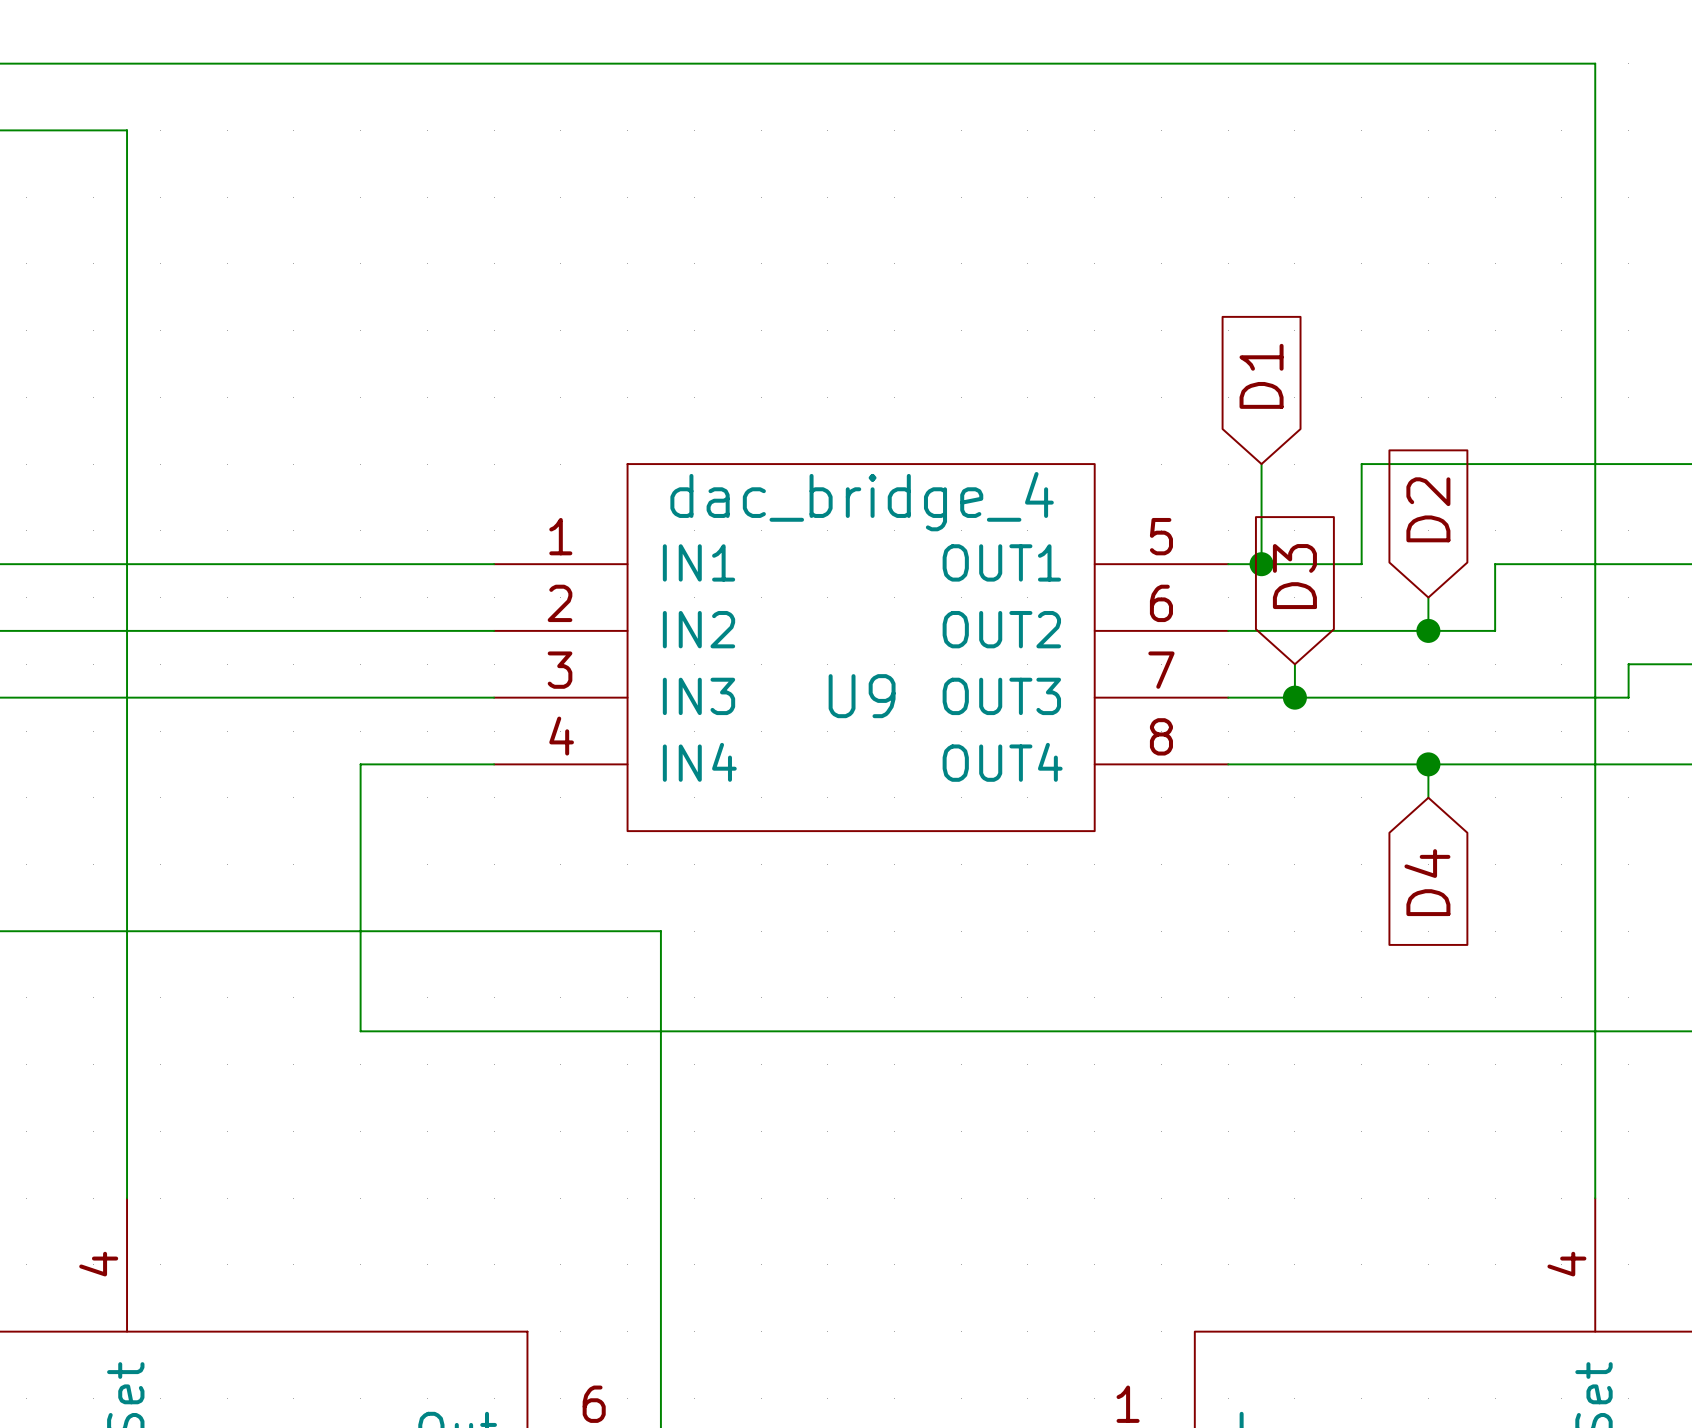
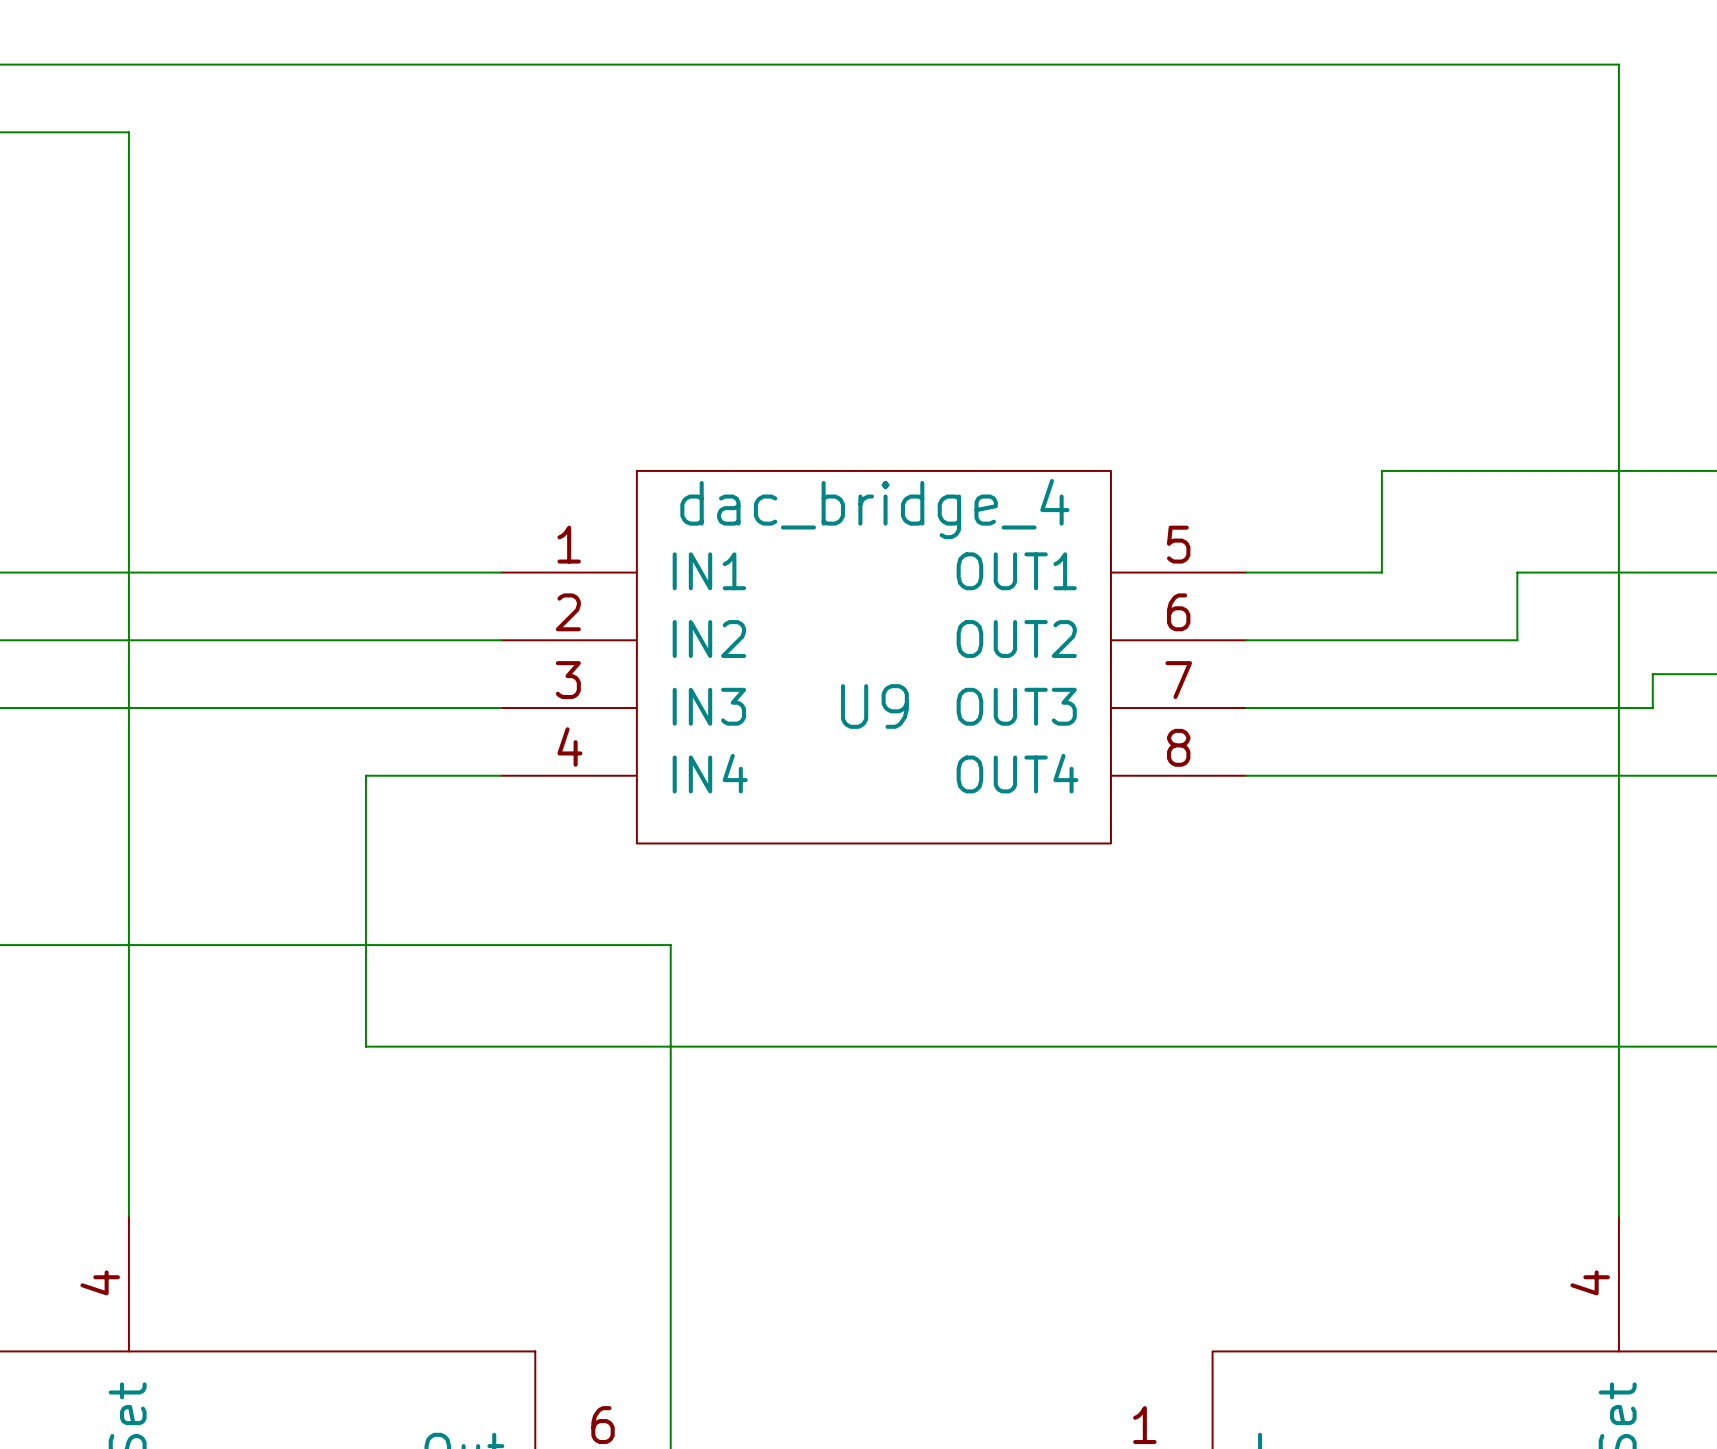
global label: D1 (1261, 376) -> none
wire: (1261, 464) (1261, 564) -> none
global label: D2 (1428, 509) -> none
junction: (1261, 564) -> none
global label: D3 (1294, 576) -> none
wire: (1428, 597) (1428, 630) -> none
junction: (1428, 630) -> none
wire: (1294, 664) (1294, 697) -> none
junction: (1294, 697) -> none
wire: (1428, 764) (1428, 797) -> none
junction: (1428, 764) -> none
global label: D4 (1427, 882) -> none

